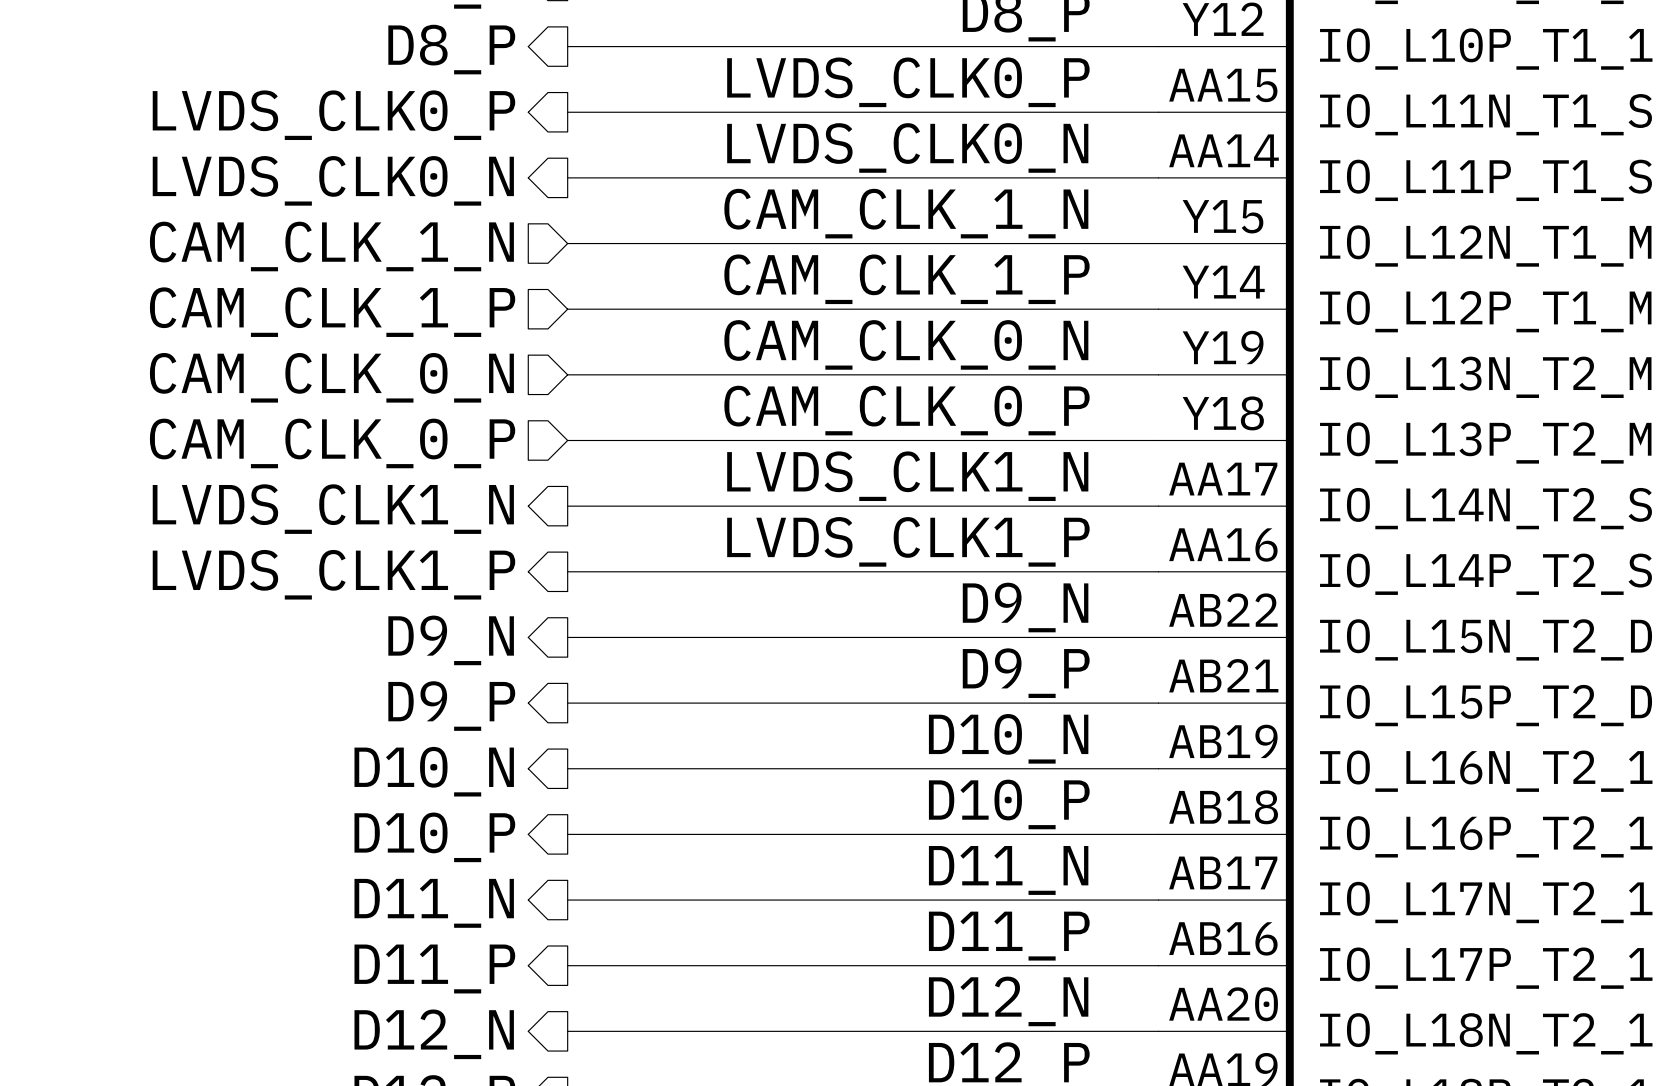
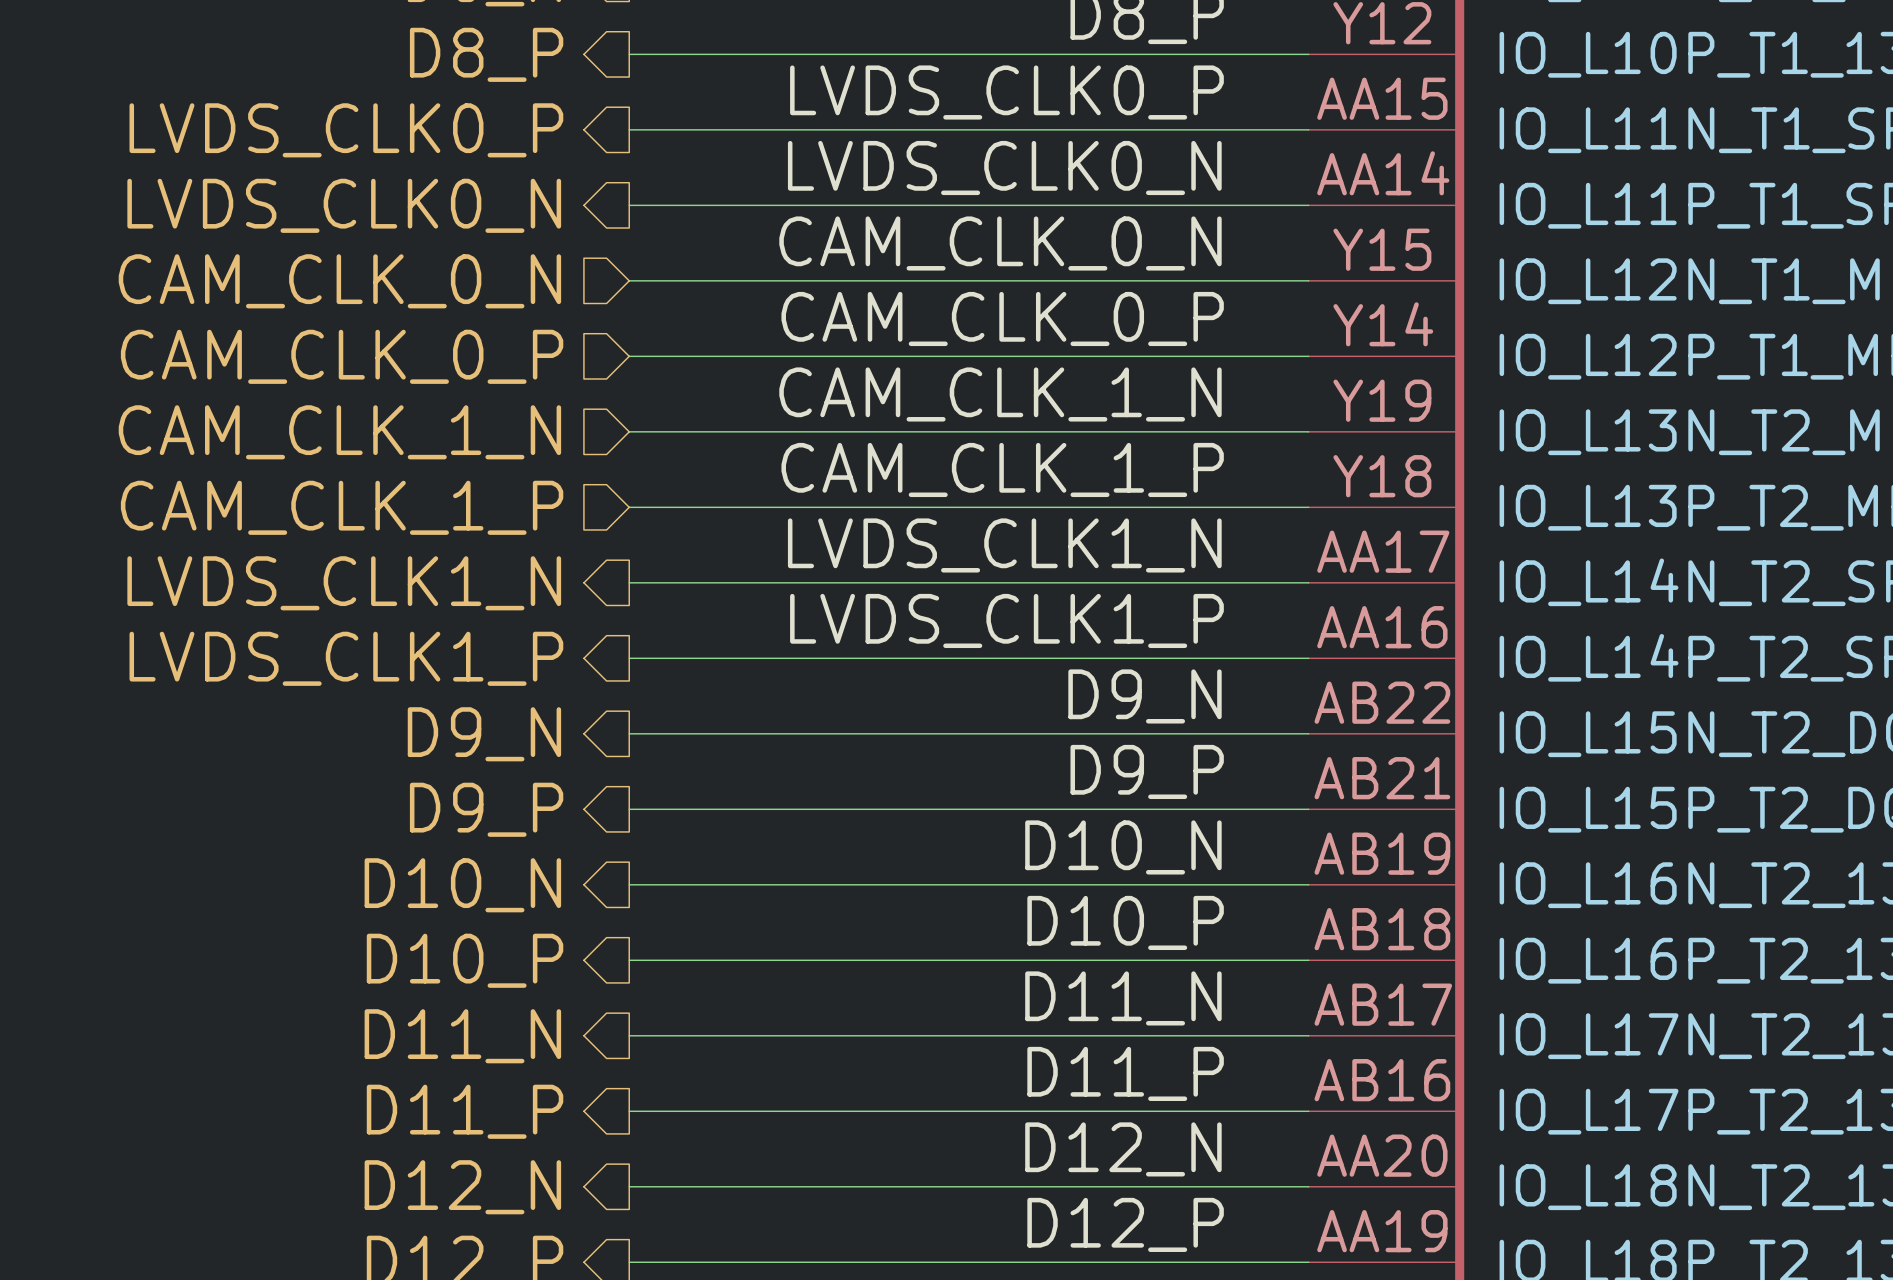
label: CAM_CLK_1_N (906, 213) -> CAM_CLK_0_N (1000, 243)
hierarchical label: CAM_CLK_1_N (331, 246) -> CAM_CLK_0_N (339, 281)
label: CAM_CLK_1_P (907, 279) -> CAM_CLK_0_P (1002, 318)
hierarchical label: CAM_CLK_1_P (332, 312) -> CAM_CLK_0_P (342, 356)
label: CAM_CLK_0_N (906, 344) -> CAM_CLK_1_N (1000, 394)
hierarchical label: CAM_CLK_0_N (331, 377) -> CAM_CLK_1_N (339, 432)
label: CAM_CLK_0_P (907, 410) -> CAM_CLK_1_P (1002, 469)
hierarchical label: CAM_CLK_0_P (332, 443) -> CAM_CLK_1_P (342, 507)

